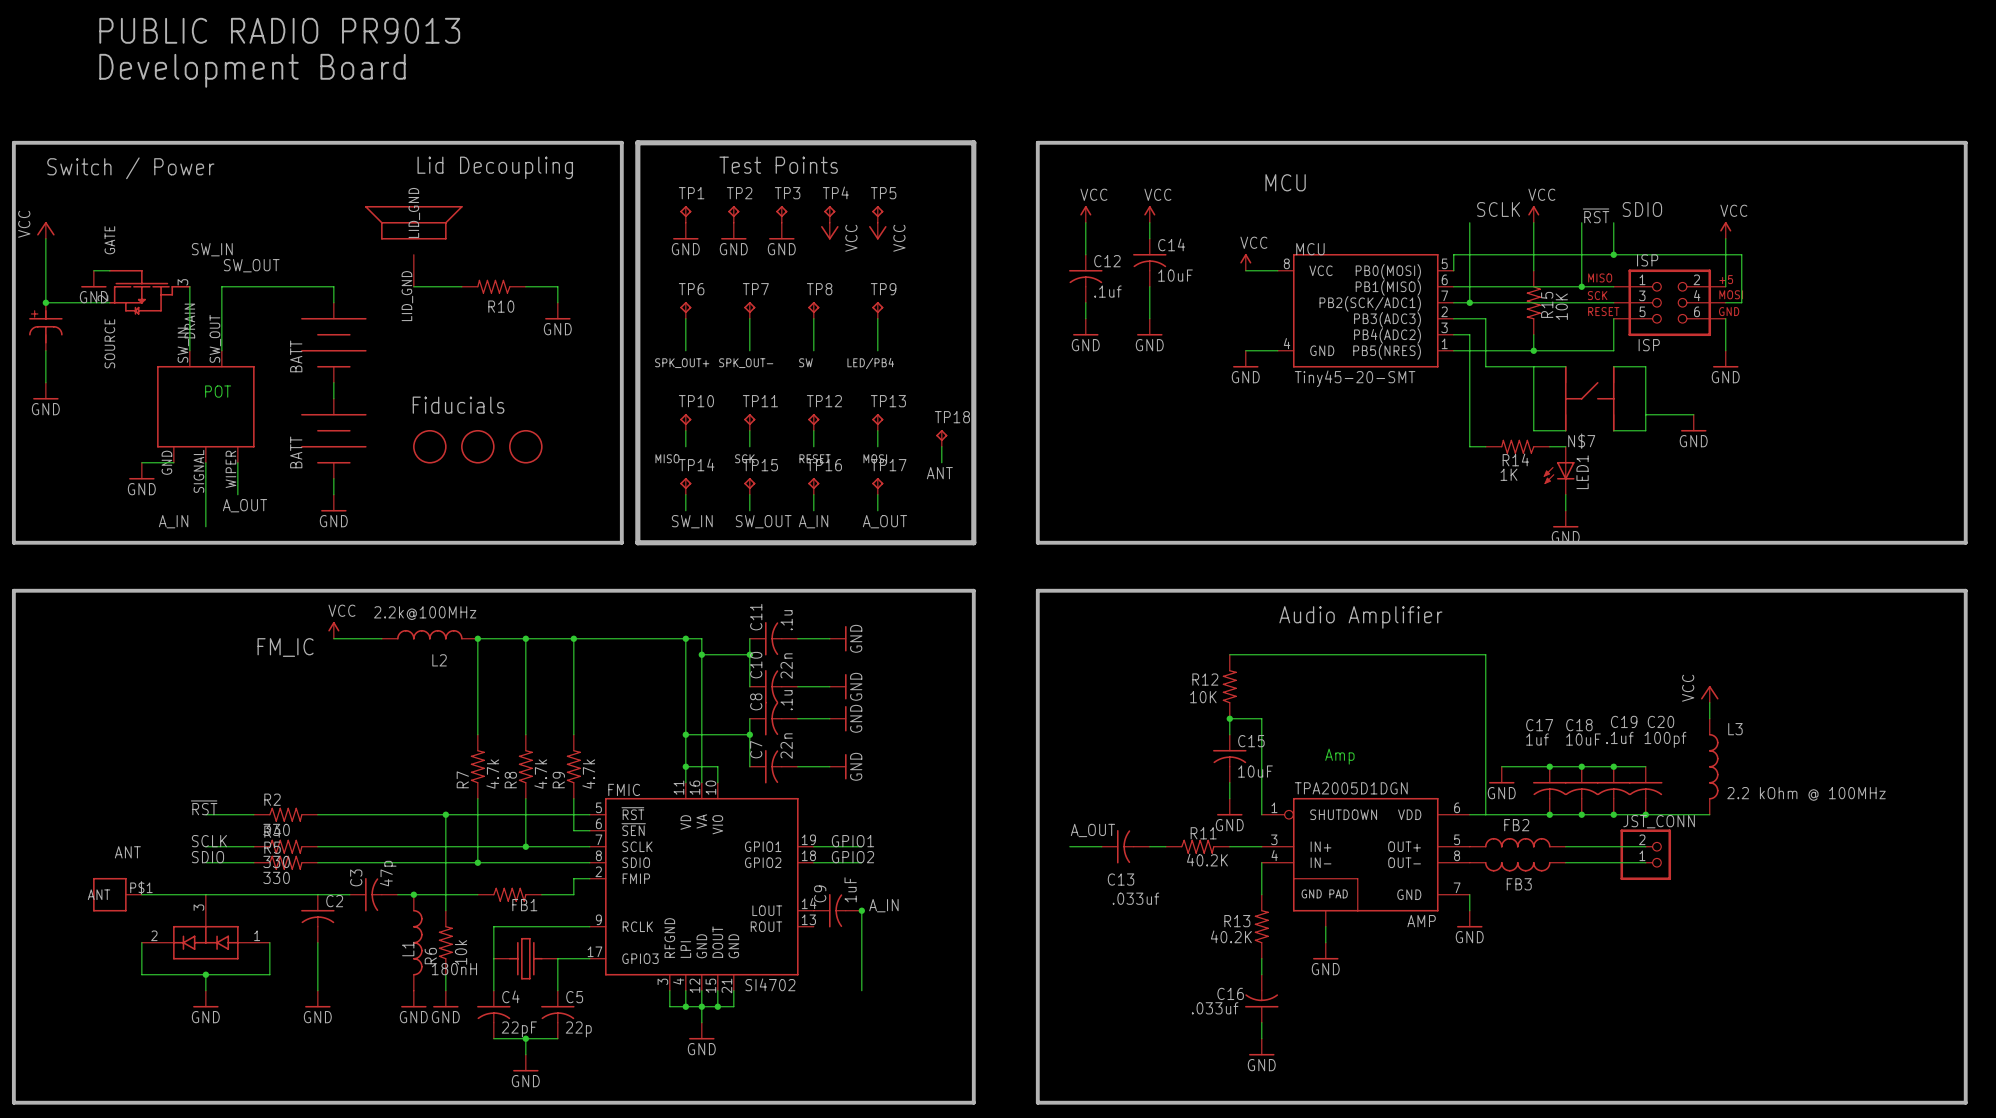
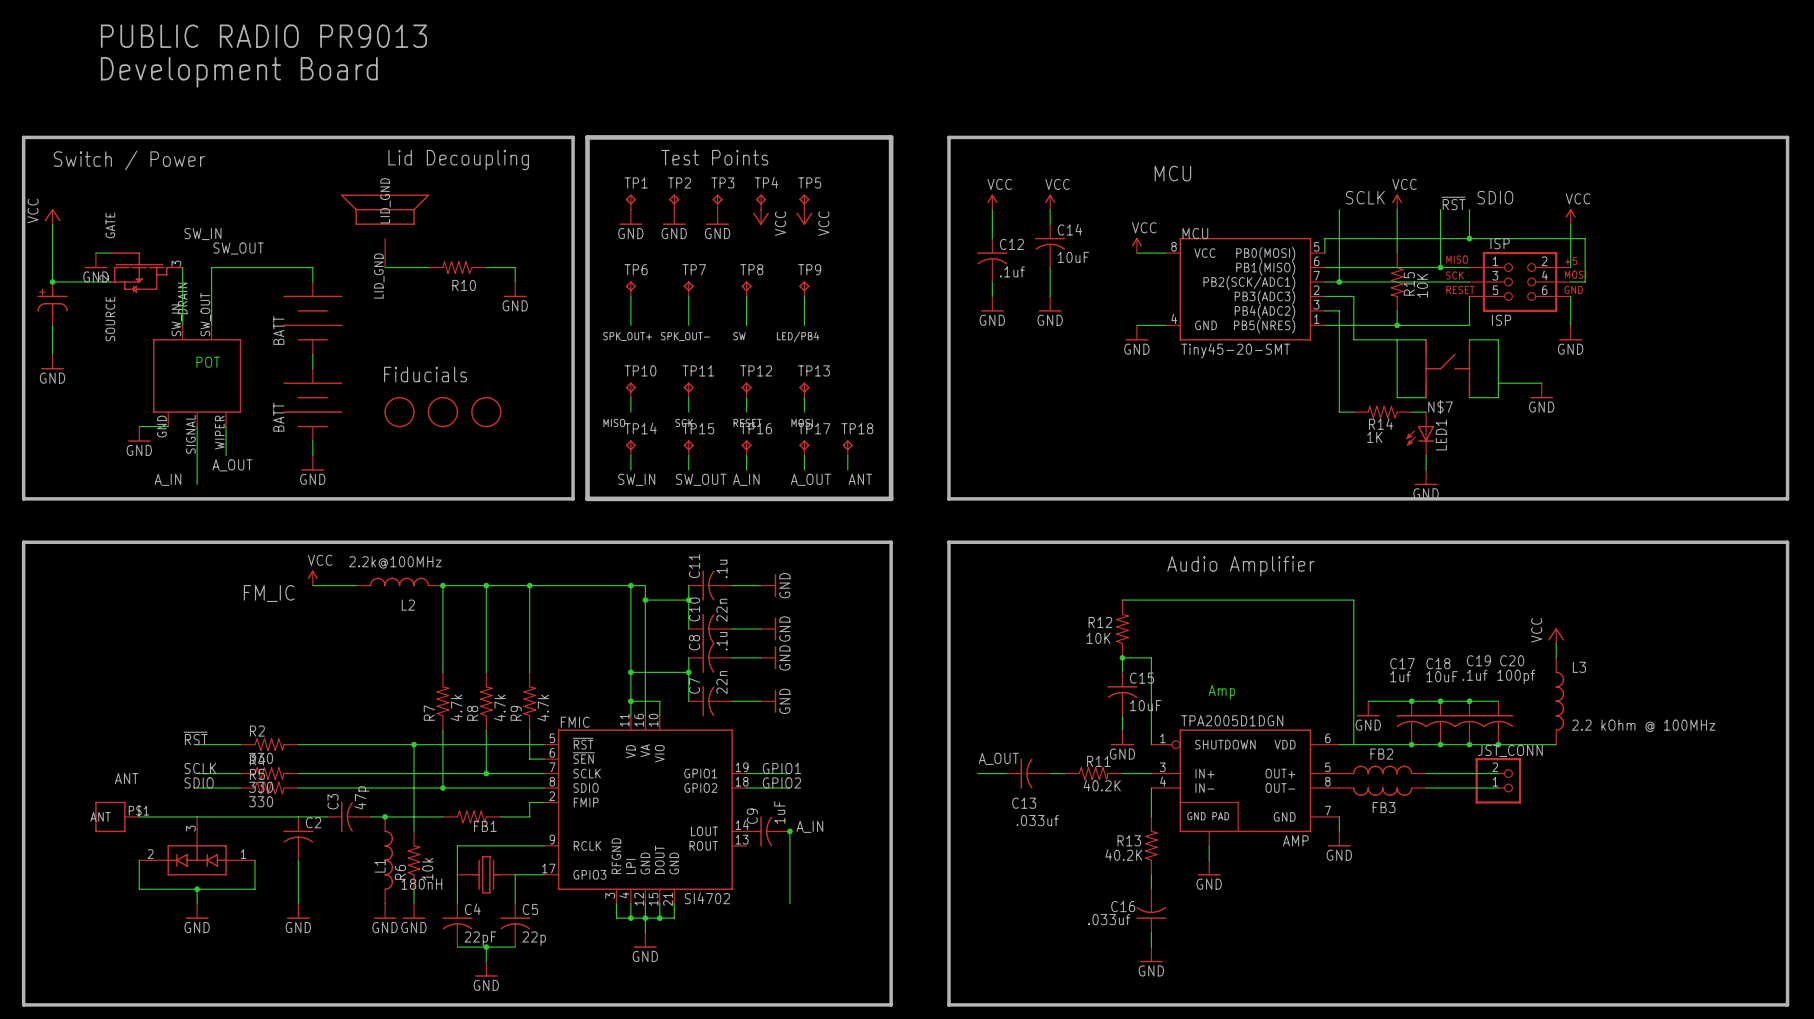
TP18 position: (941, 438) -> (847, 447)
wire: (941, 446) (941, 462) -> (847, 455) (847, 469)
label position: ANT (939, 473) -> ANT (860, 479)

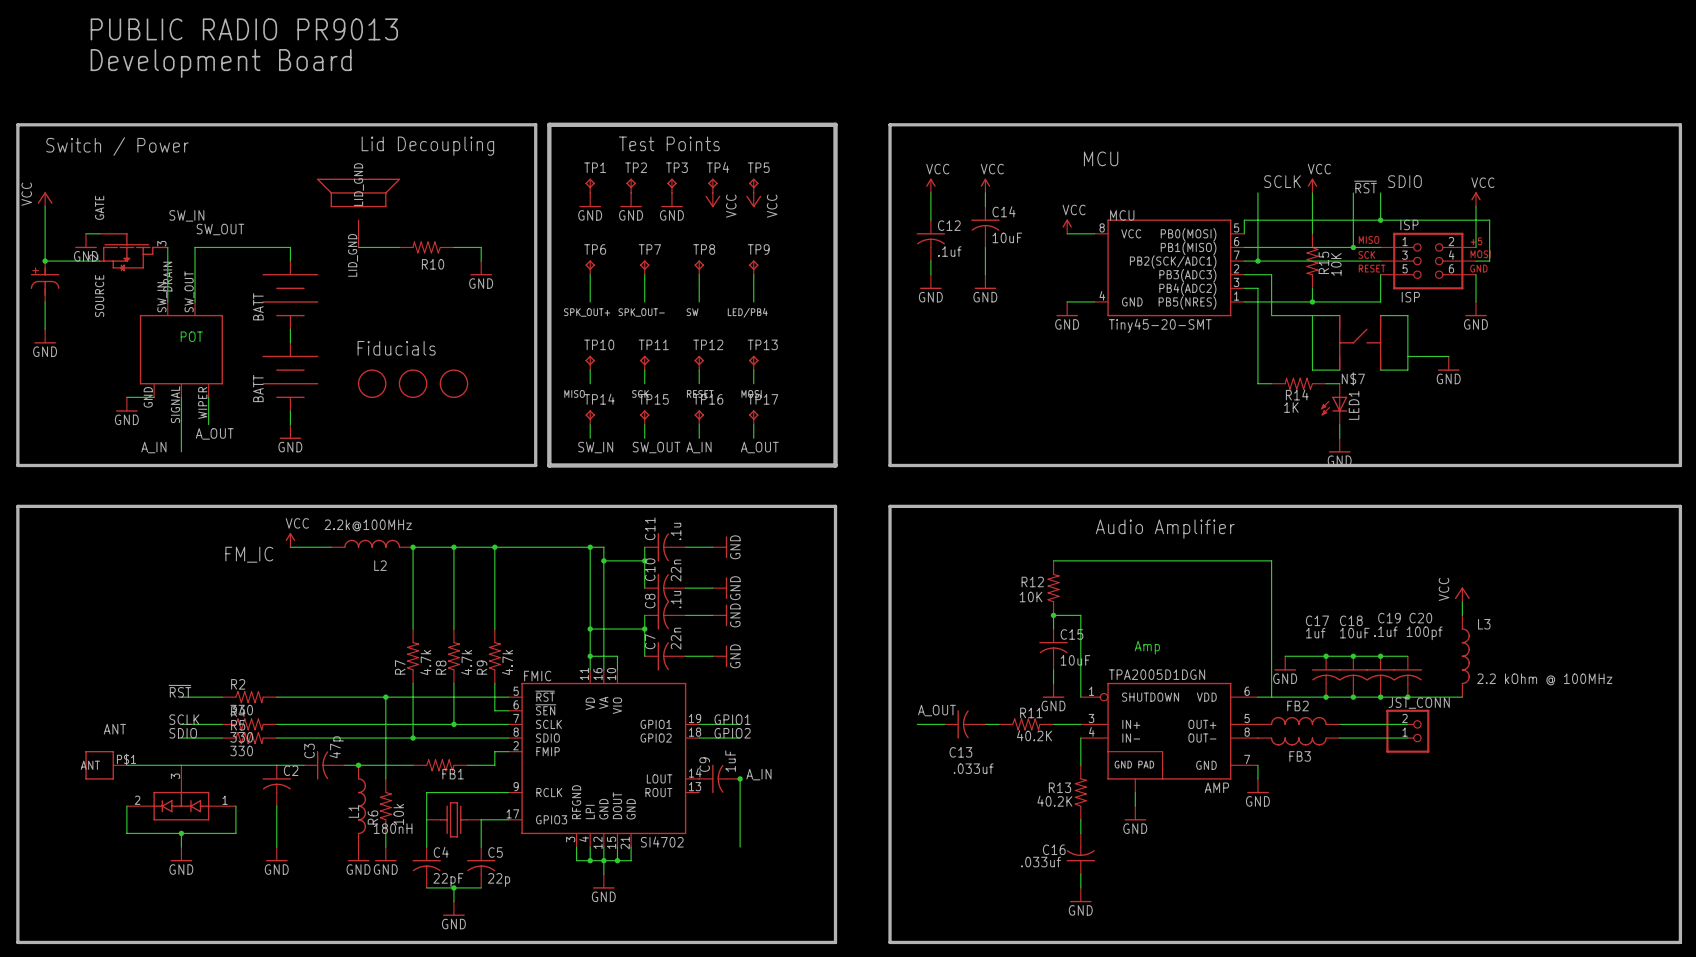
TP18: (847, 447) -> none
wire: (847, 455) (847, 469) -> none
label: ANT (860, 479) -> none

